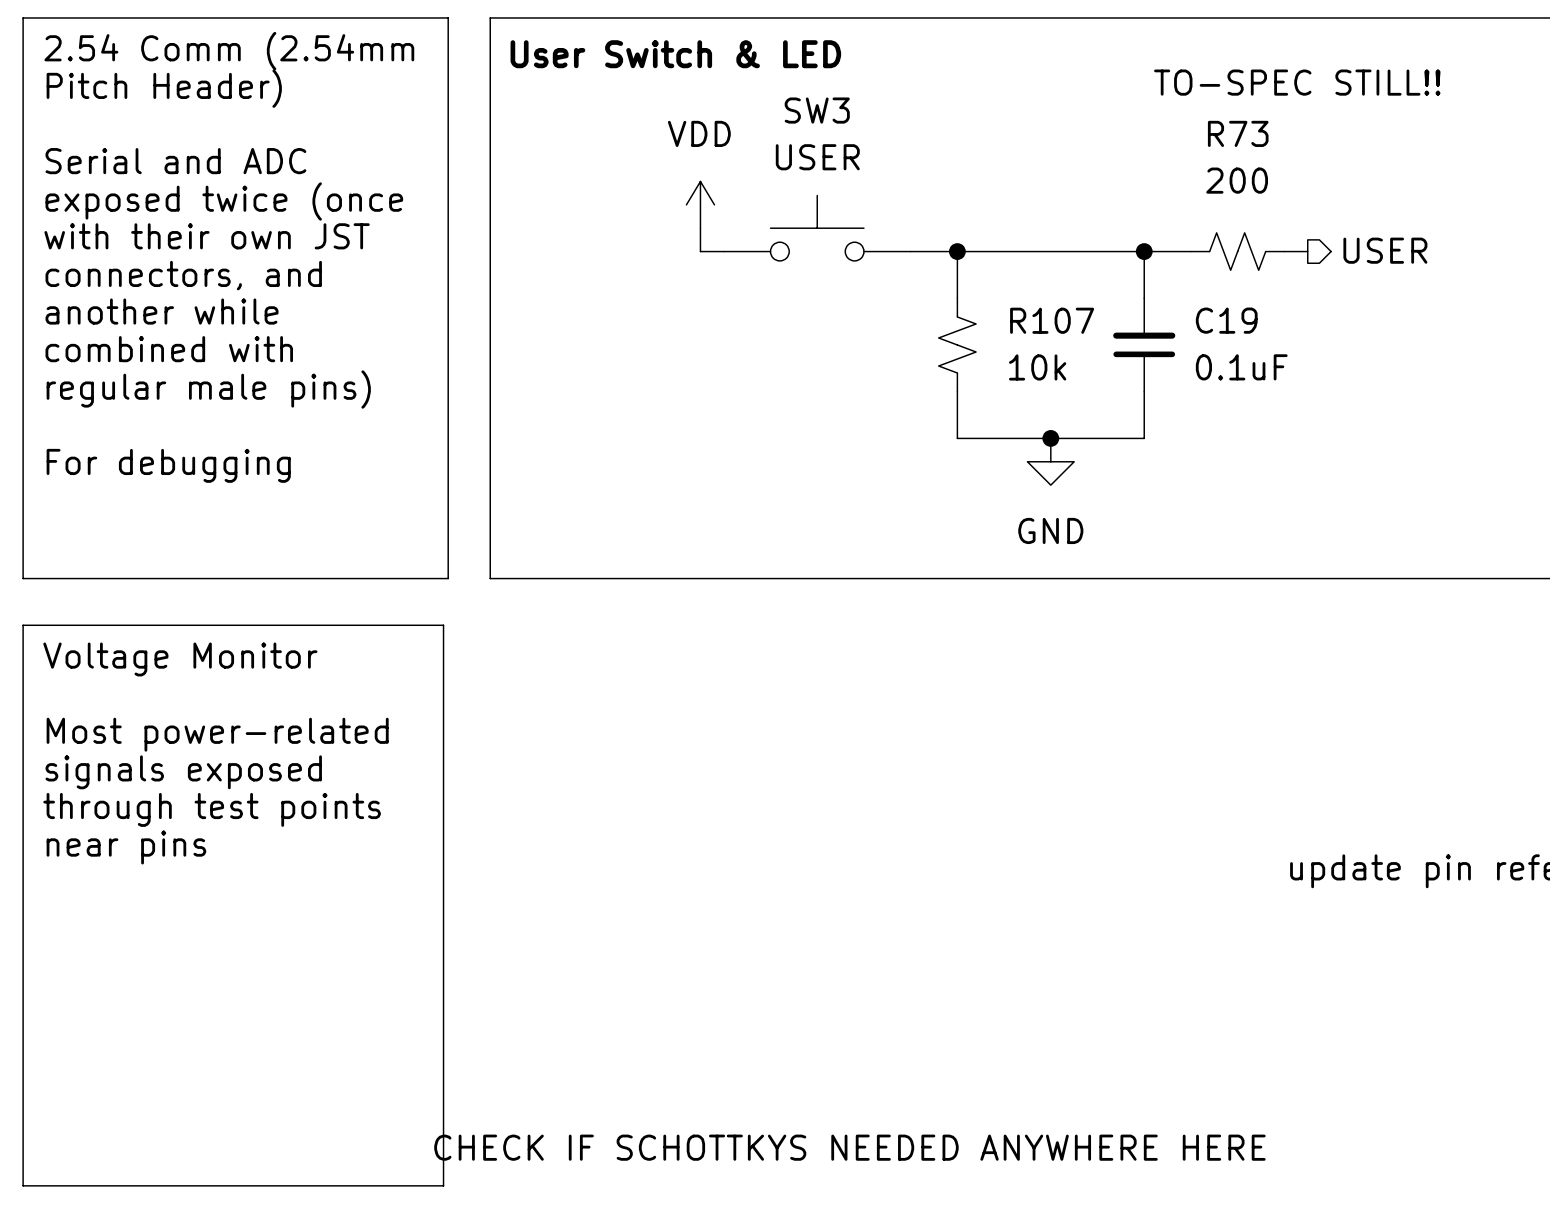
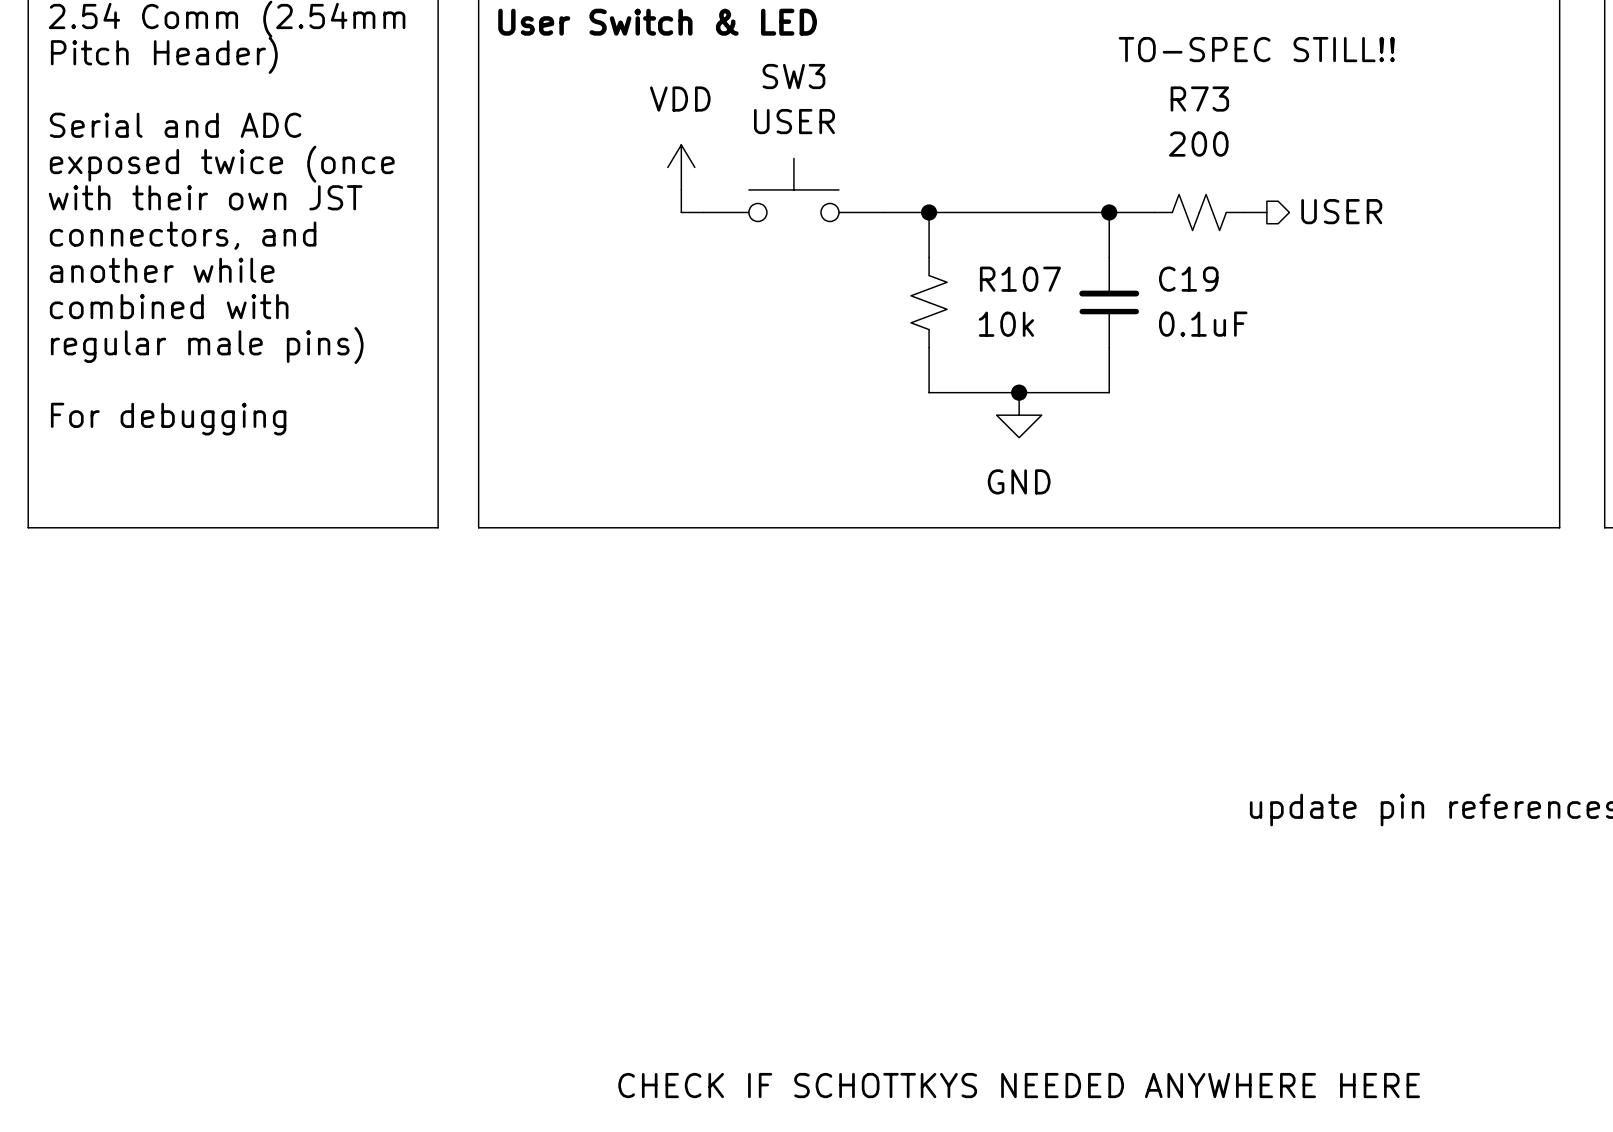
line: (23, 625) (443, 625) (443, 1185) (23, 1185) (23, 625) -> none
text: Voltage Monitor (180, 659) -> none
text: Most power-related (217, 734) -> none
text: signals exposed (183, 772) -> none
text: through test points (212, 809) -> none
text: near pins (126, 847) -> none
text position: CHECK IF SCHOTTKYS NEEDED ANYWHERE HERE (849, 1147) -> CHECK IF SCHOTTKYS NEEDED ANYWHERE HERE (1019, 1085)

